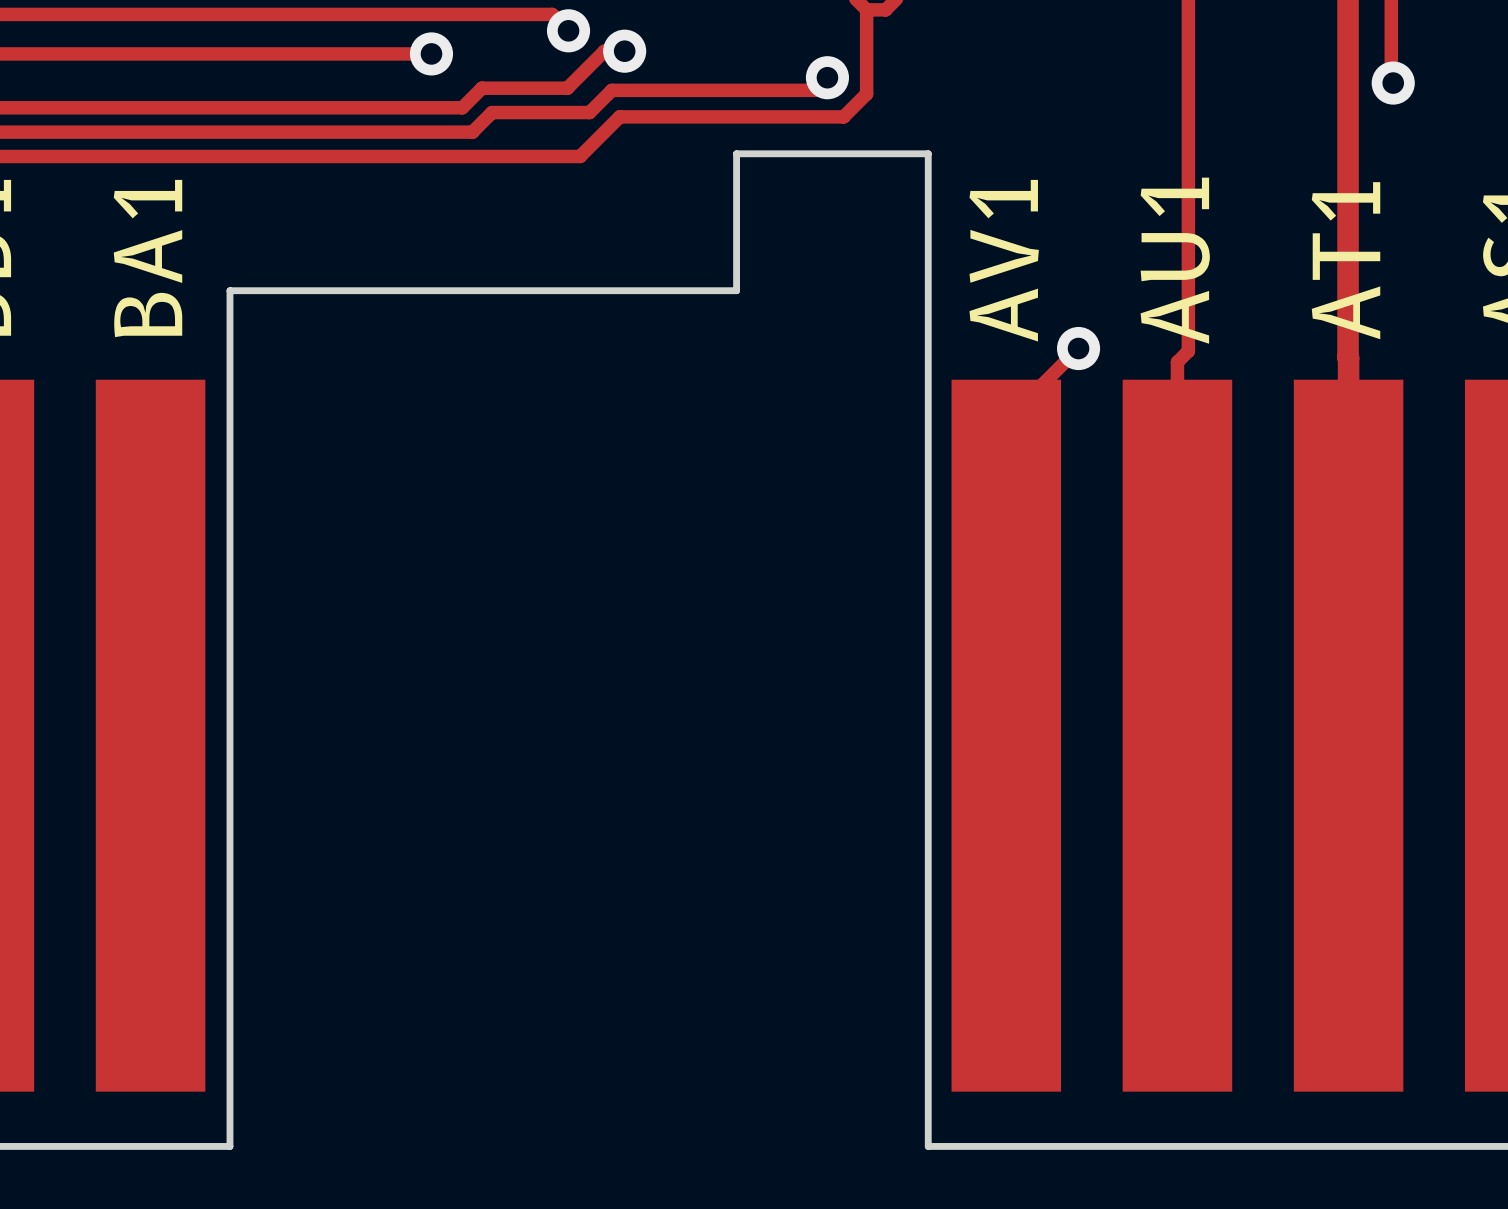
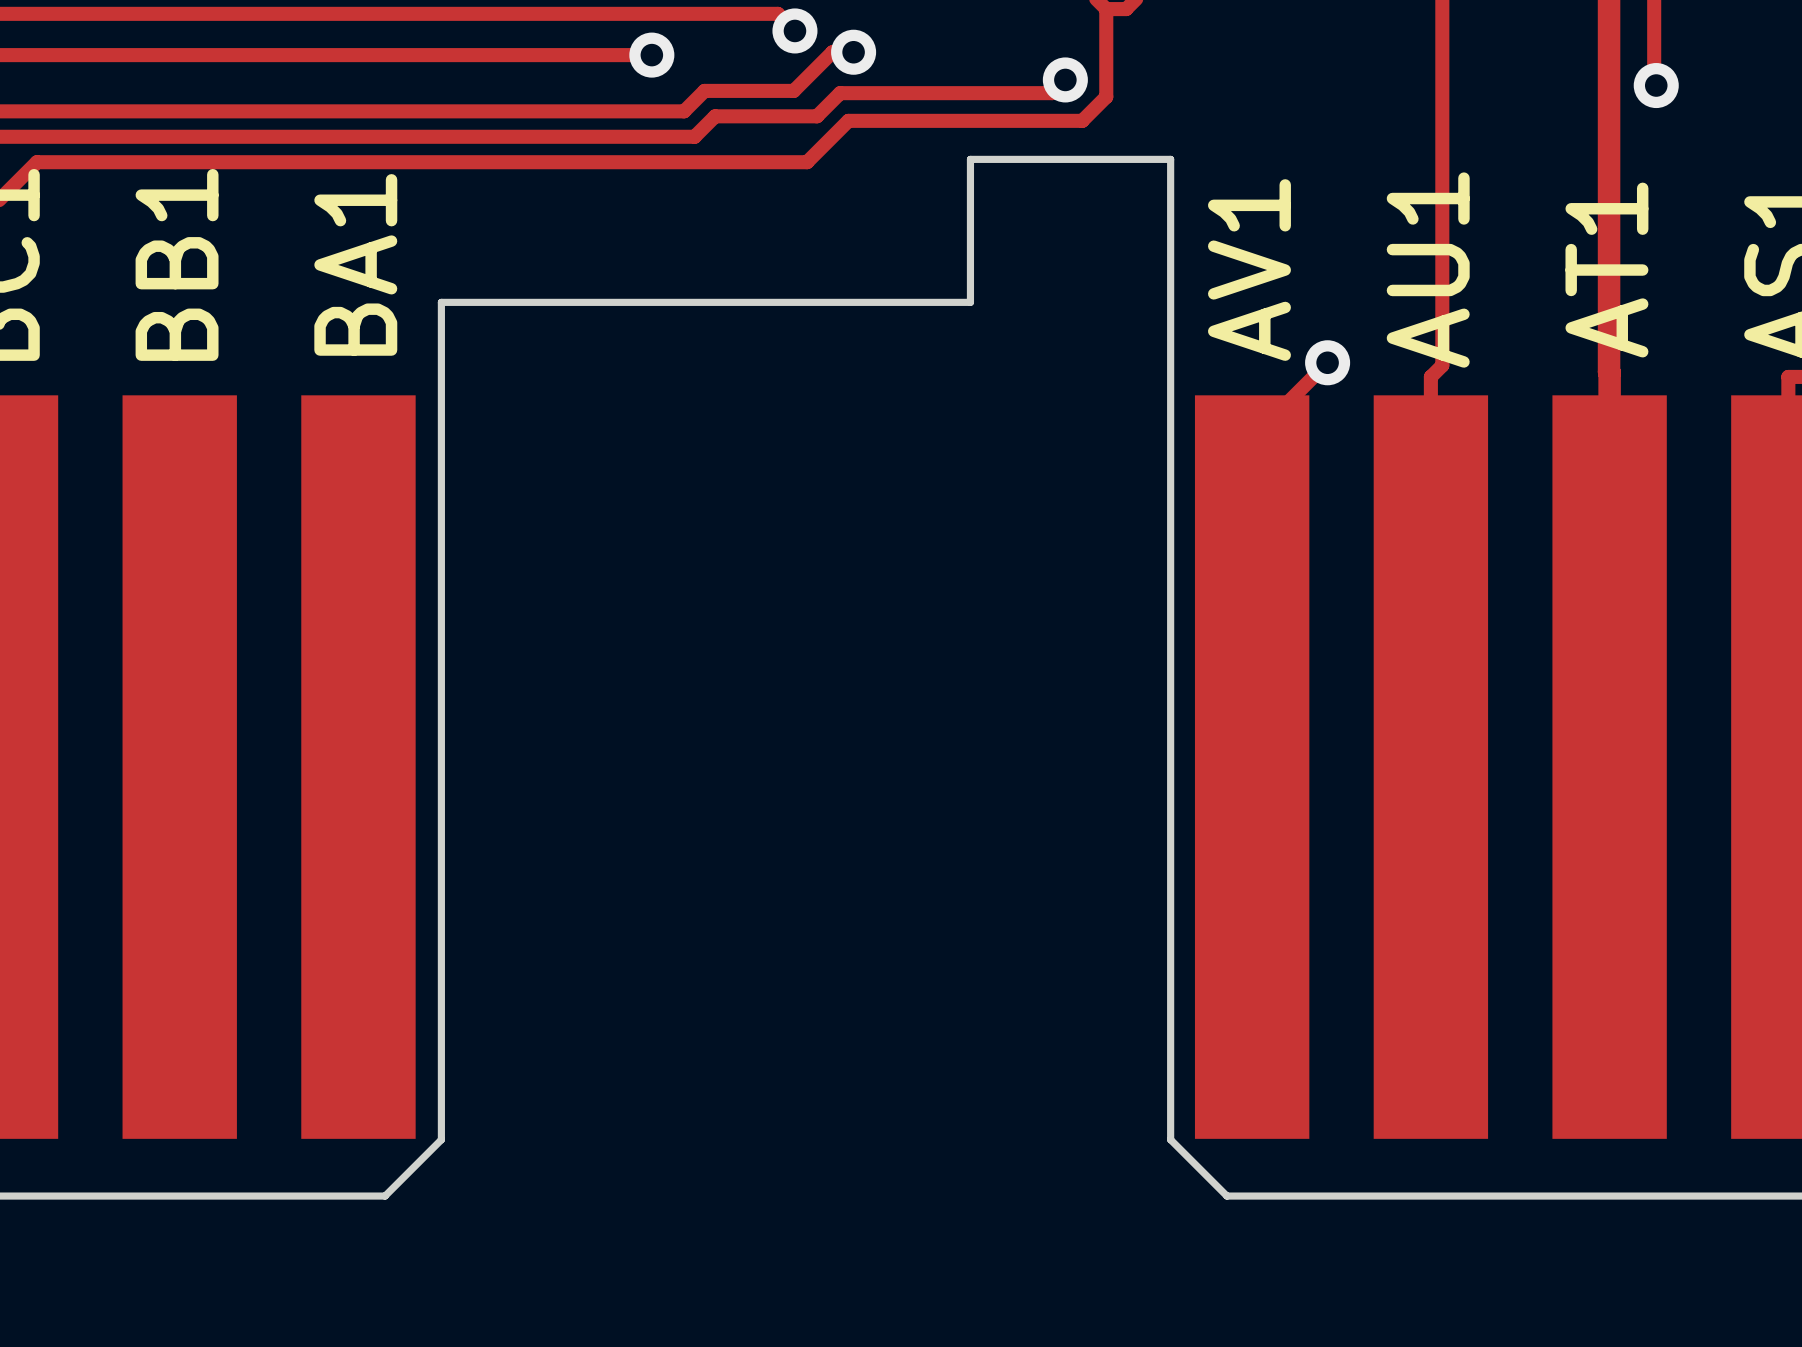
board edge: (229, 1092) (229, 1146) (176, 1146) -> (441, 1139) (385, 1196)
board edge: (928, 1092) (928, 1146) (982, 1146) -> (1170, 1139) (1226, 1196)

